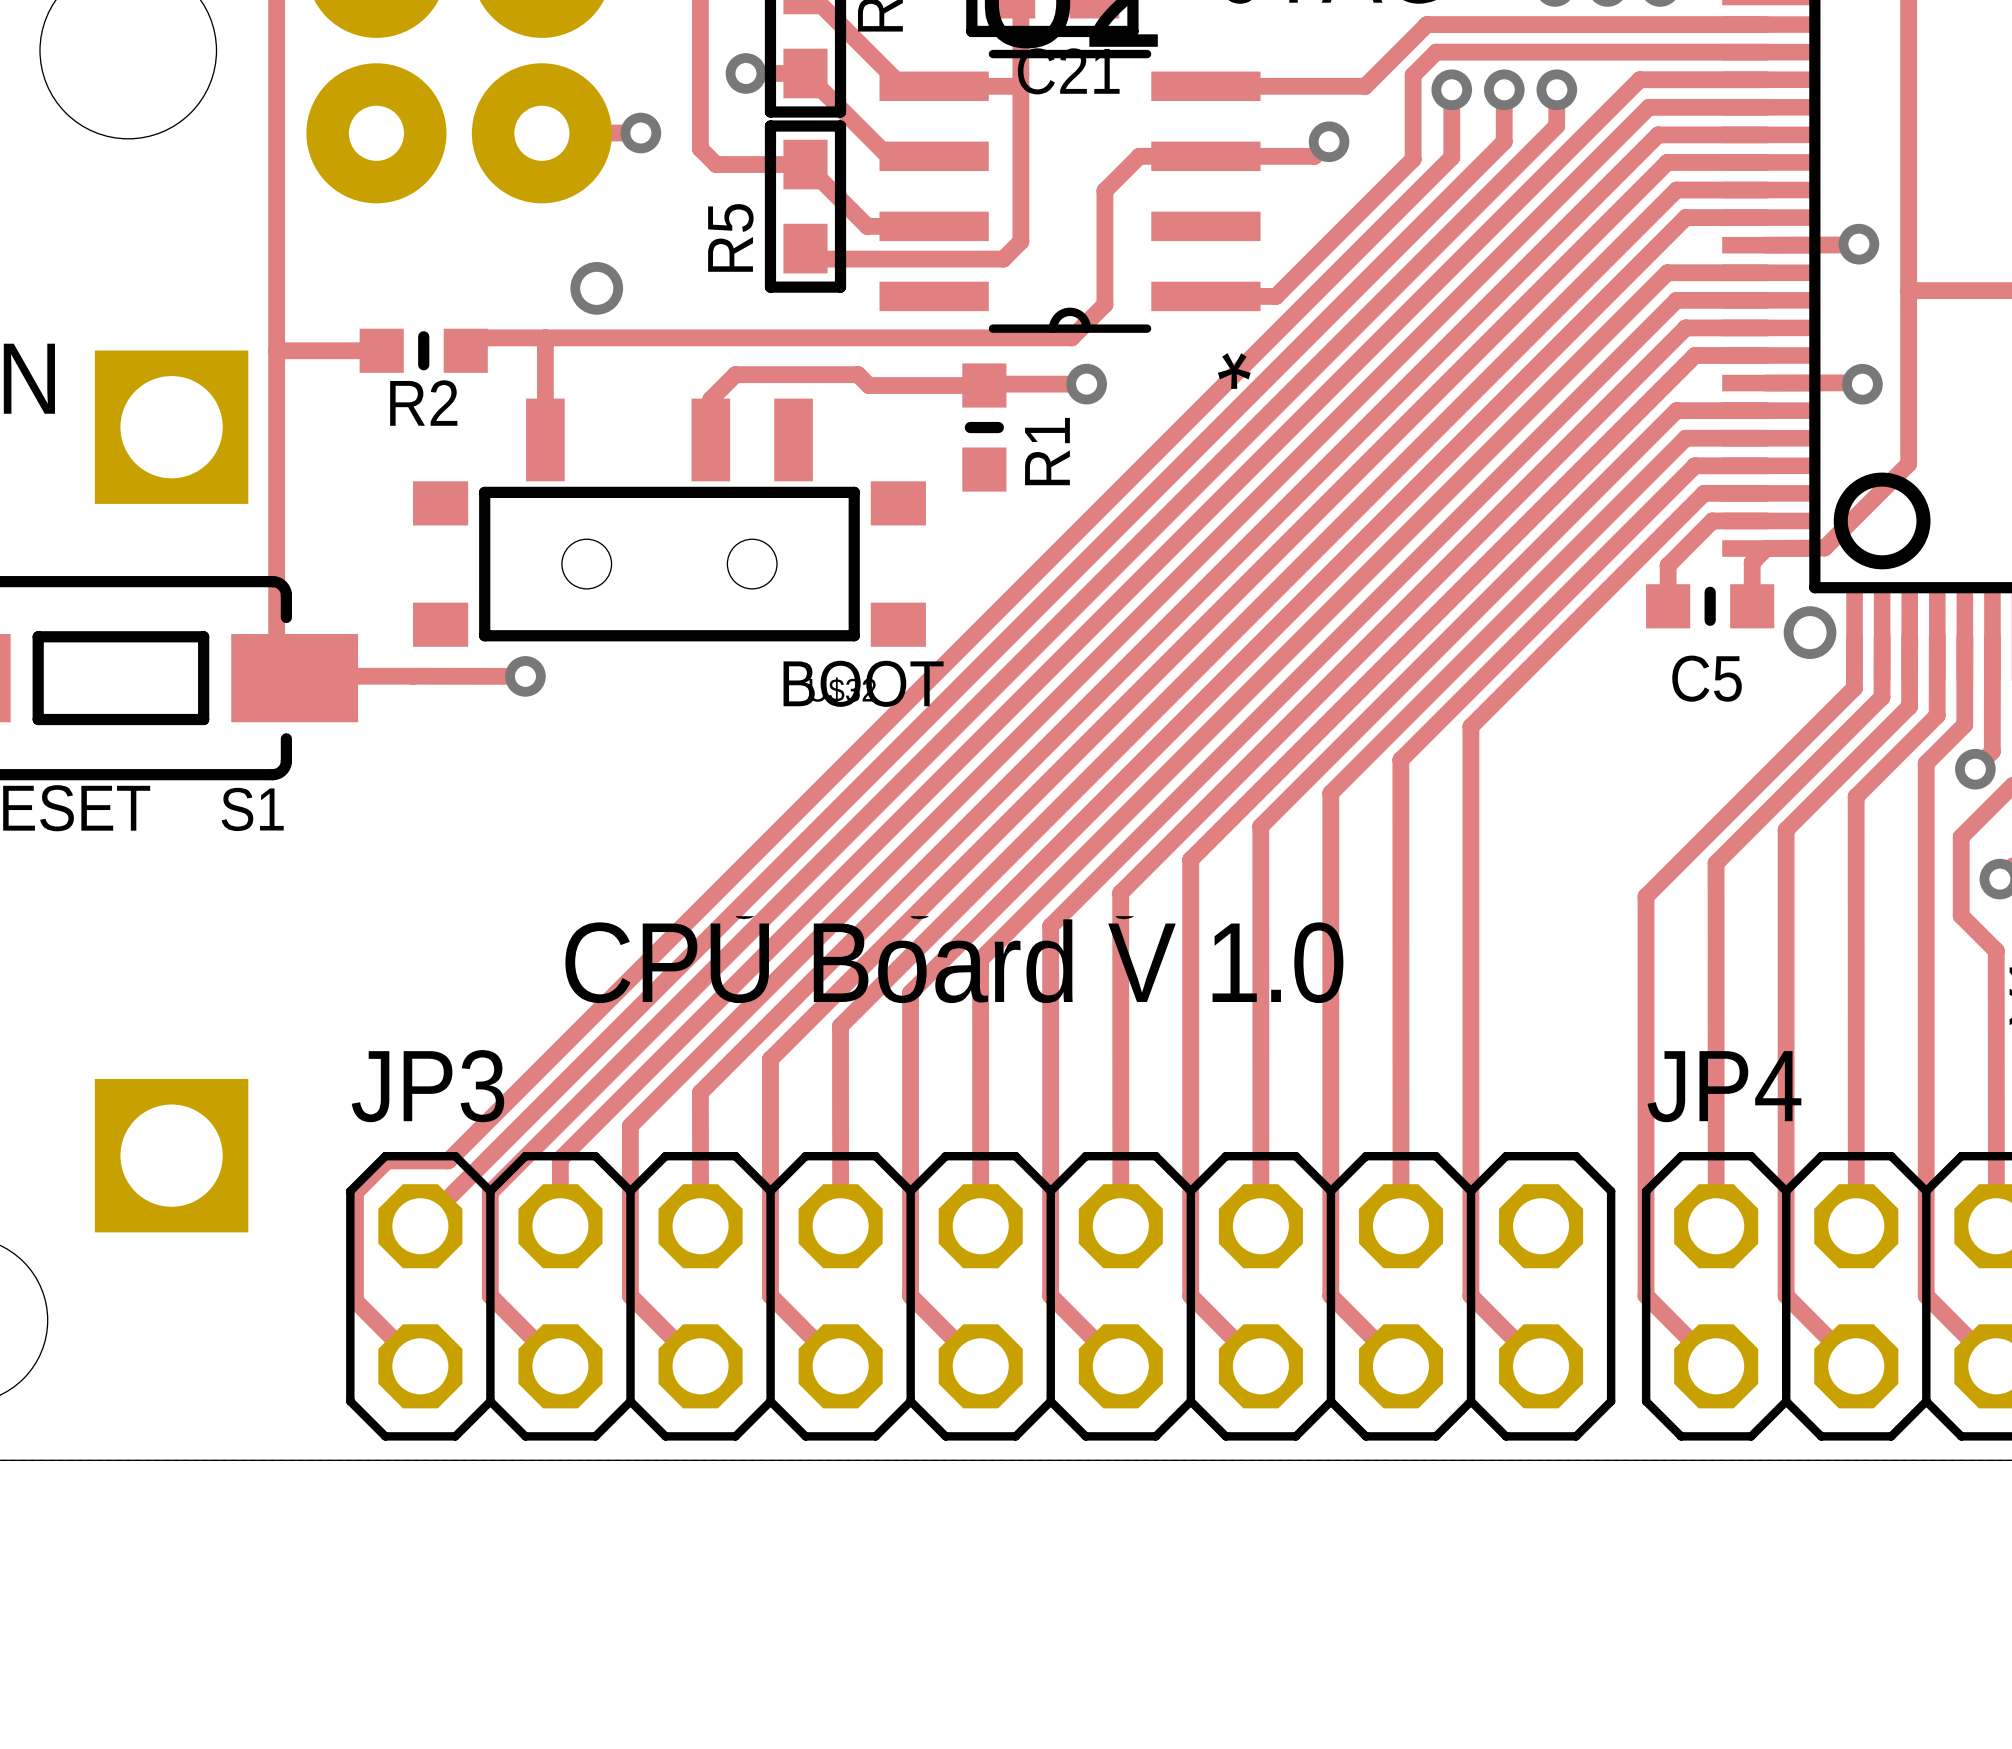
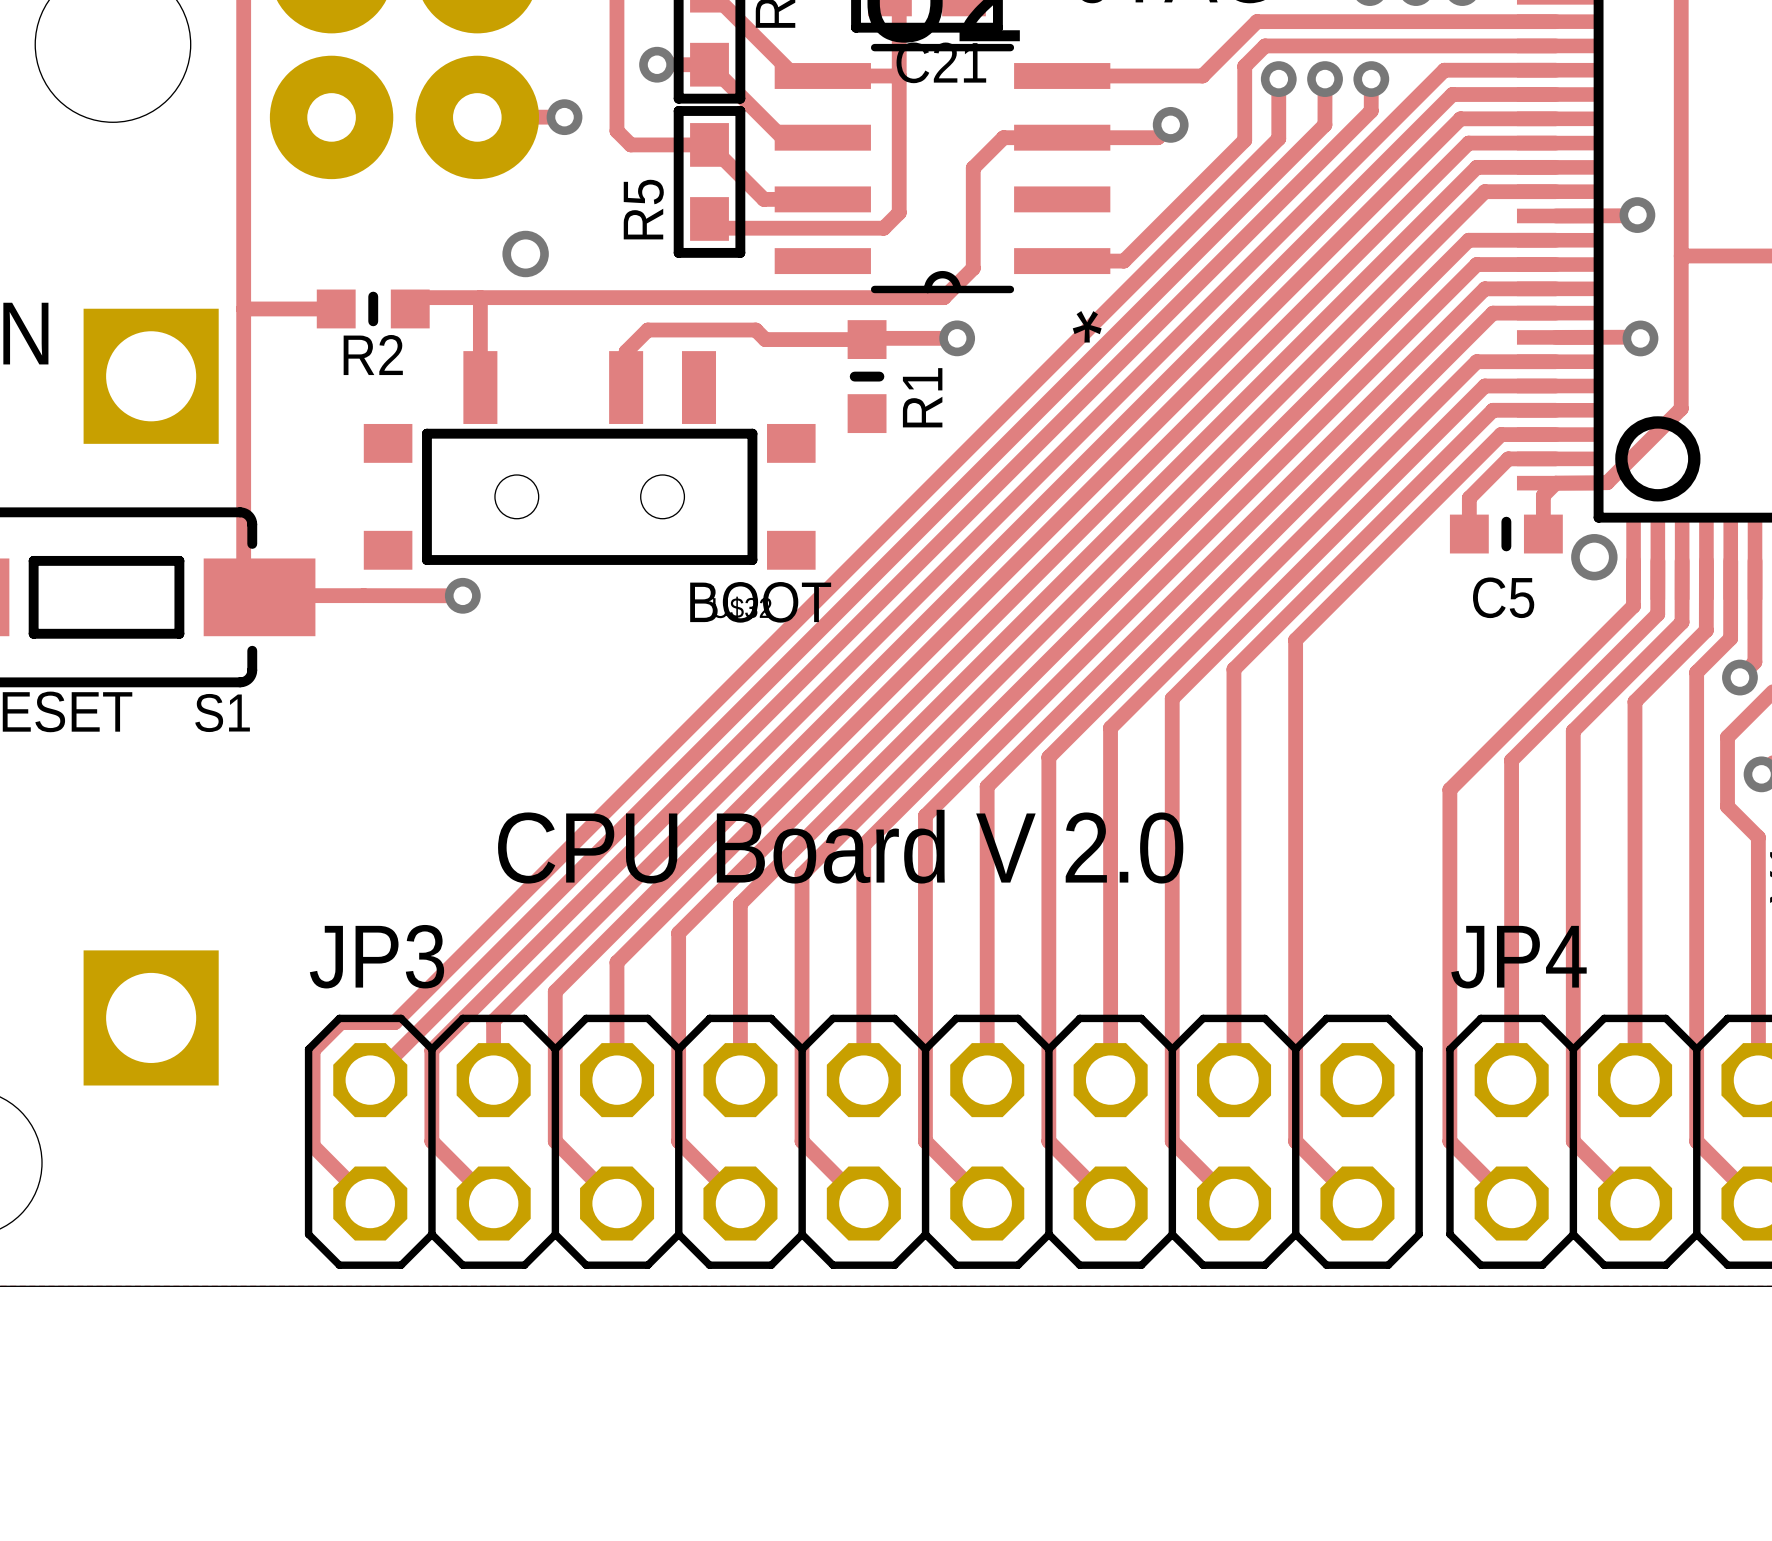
drawing: [736, 916, 755, 920] -> none
drawing: [910, 916, 929, 920] -> none
drawing: [1115, 916, 1134, 920] -> none
text: CPU Board V 1.0 (954, 961) -> CPU Board V 2.0 (840, 846)

